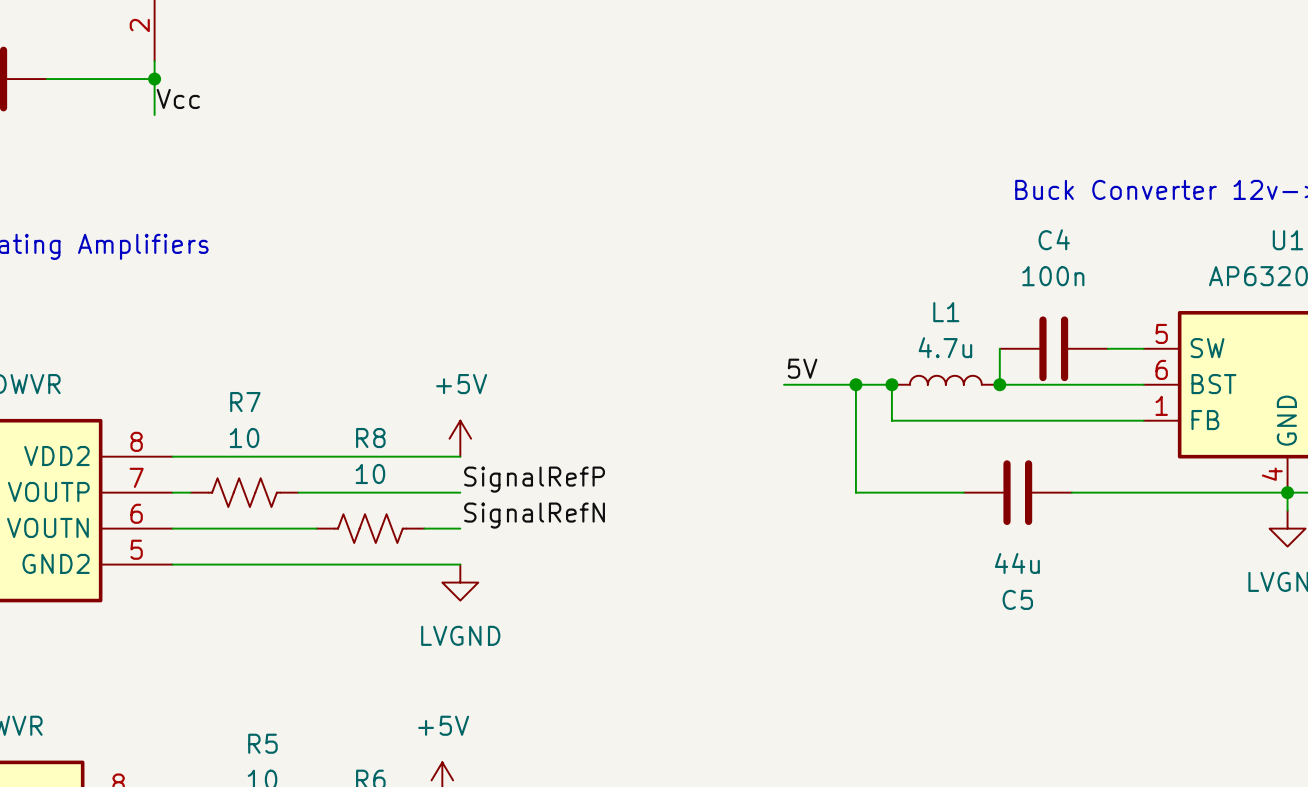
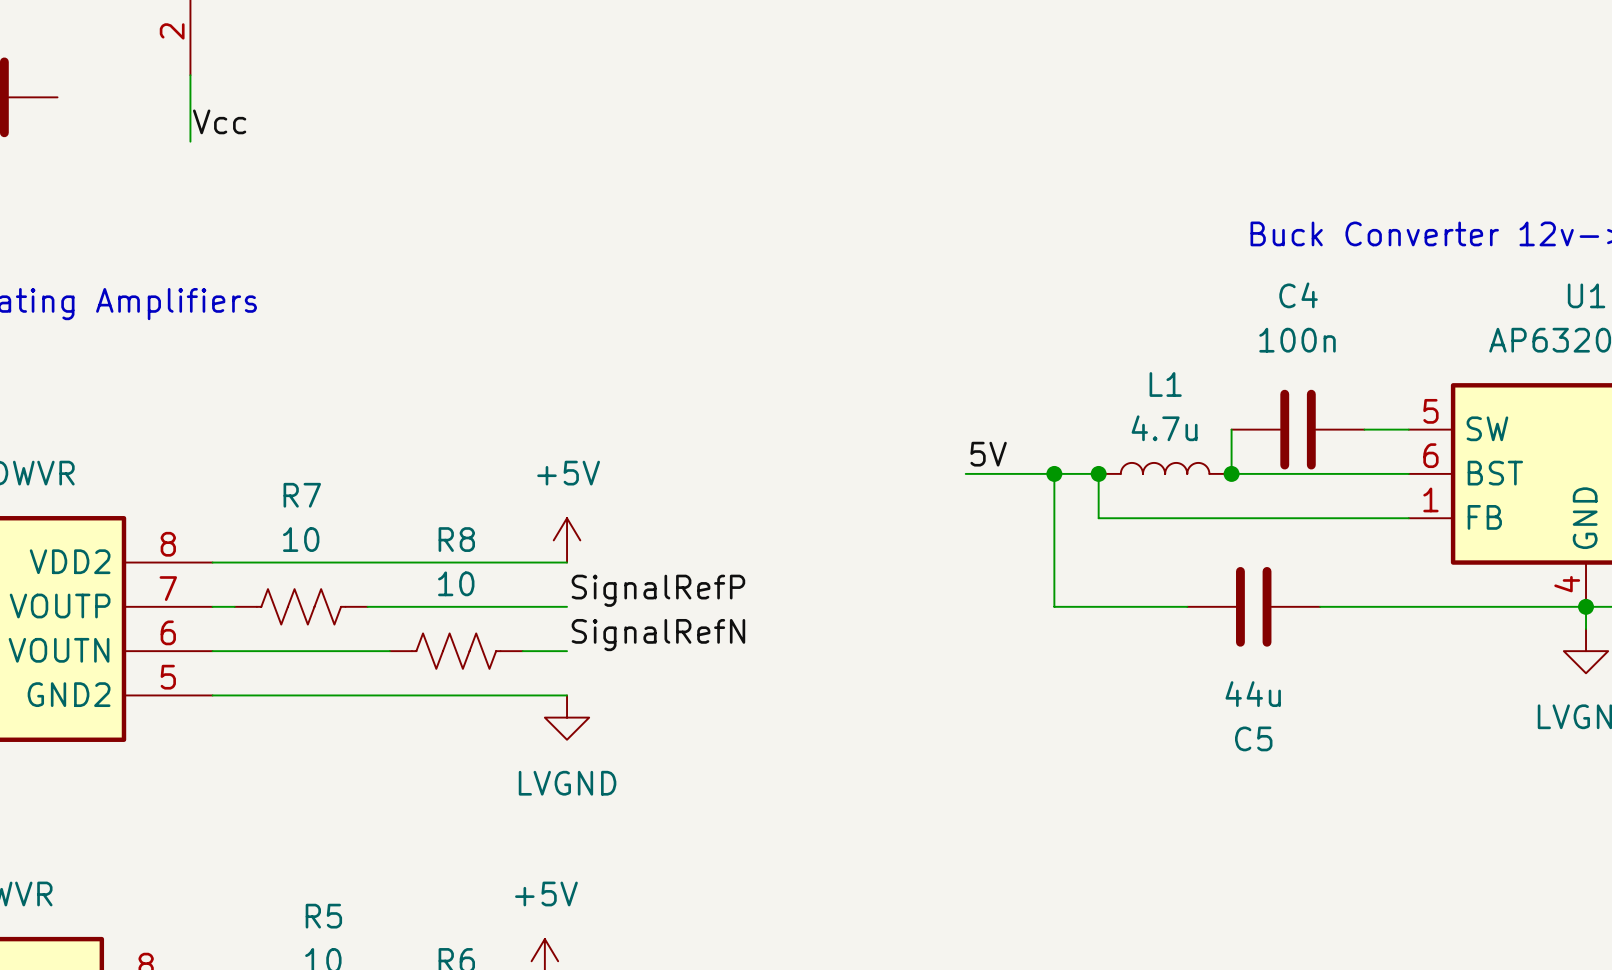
wire: (46, 79) (154, 79) -> none
junction: (154, 79) -> none

